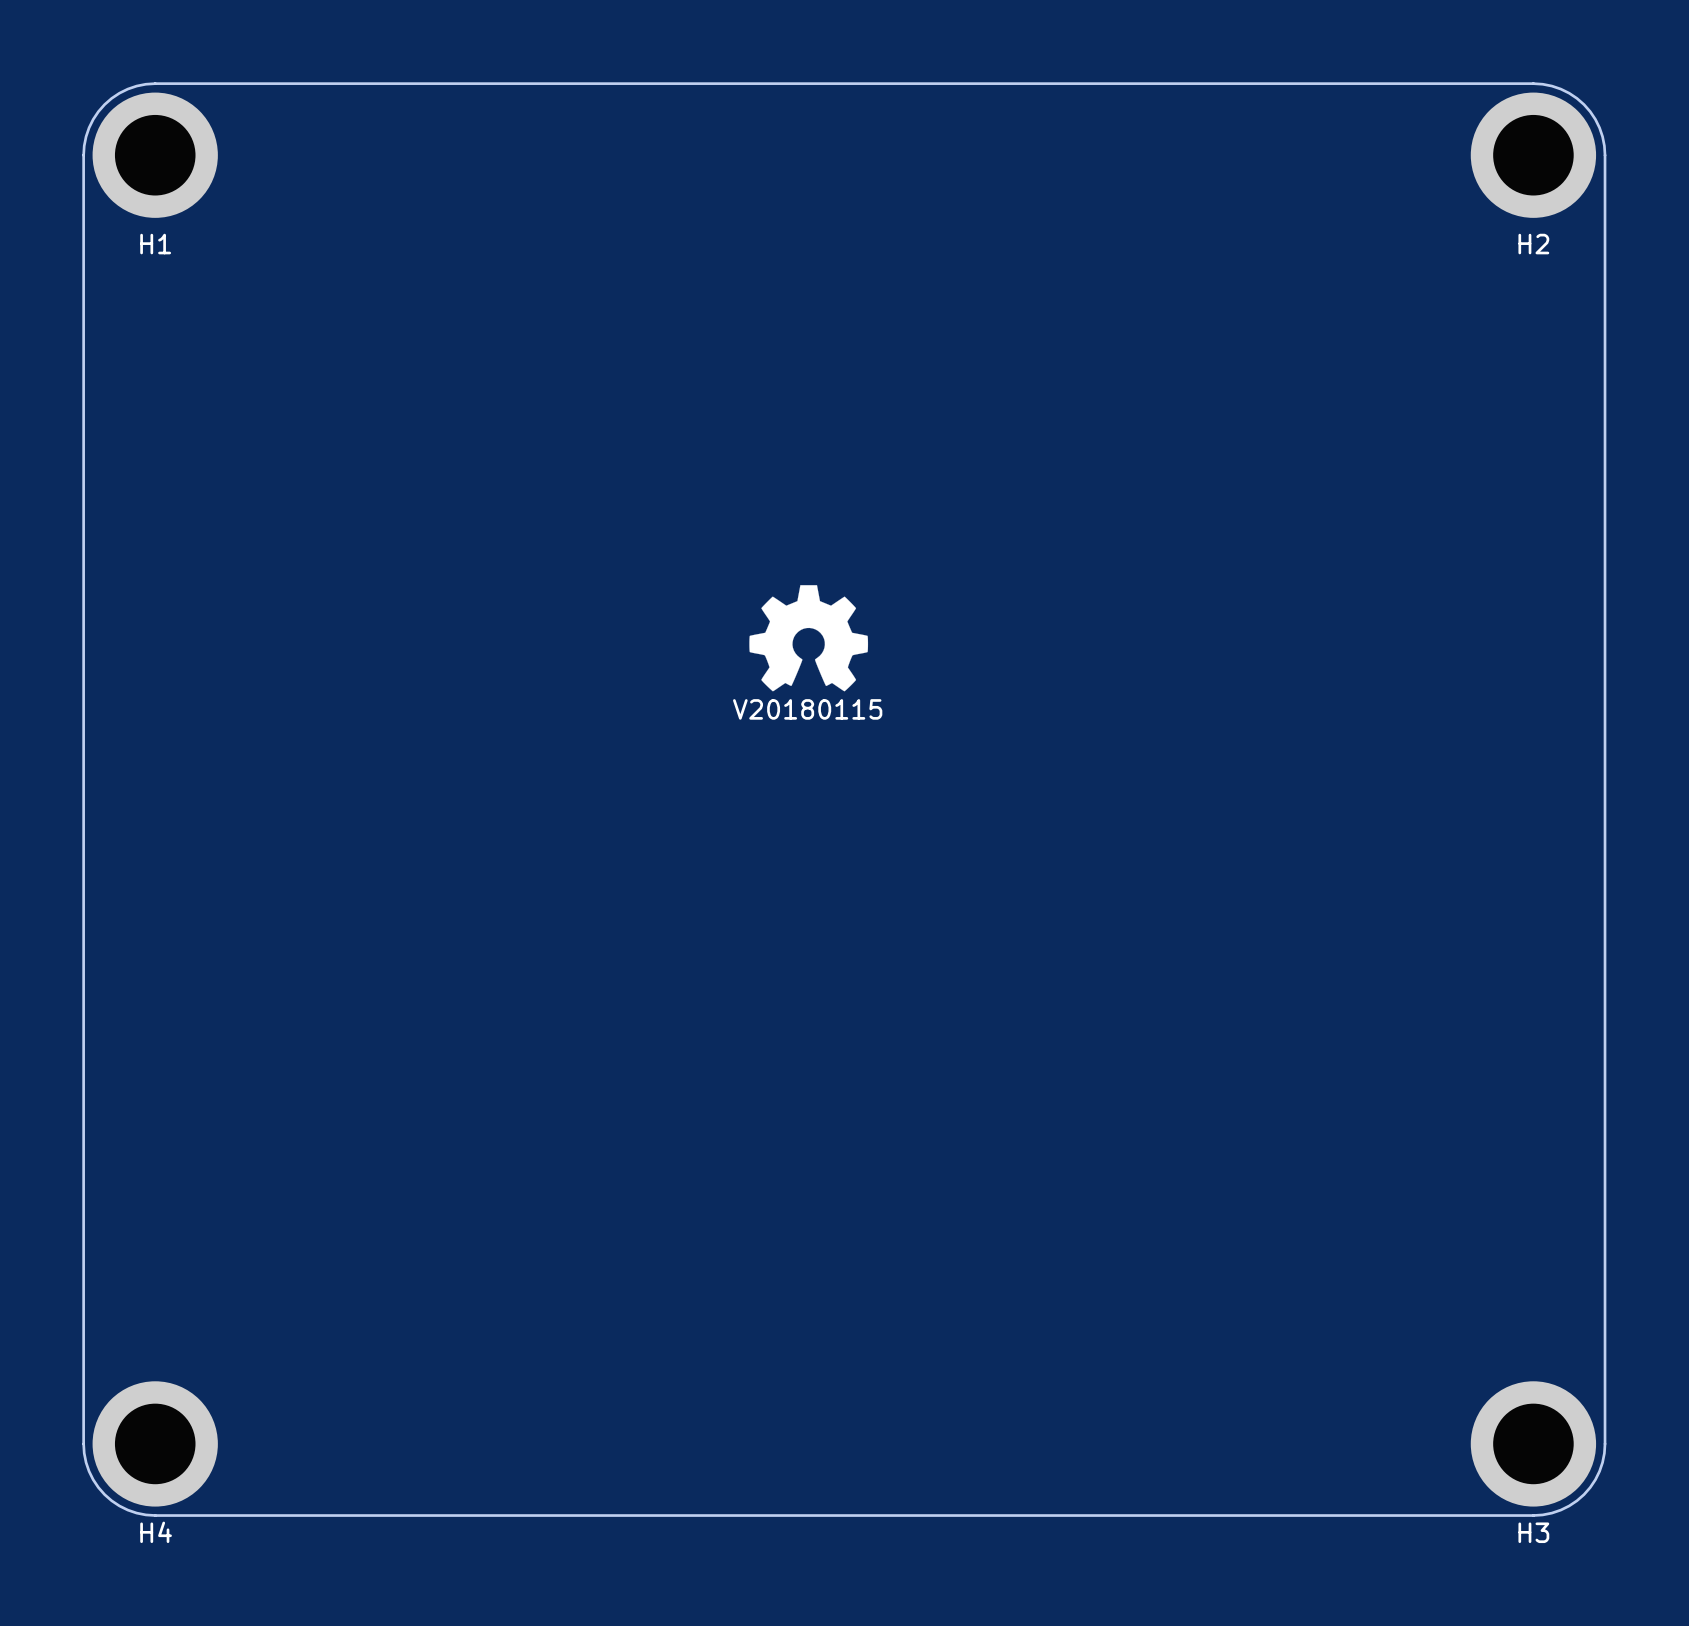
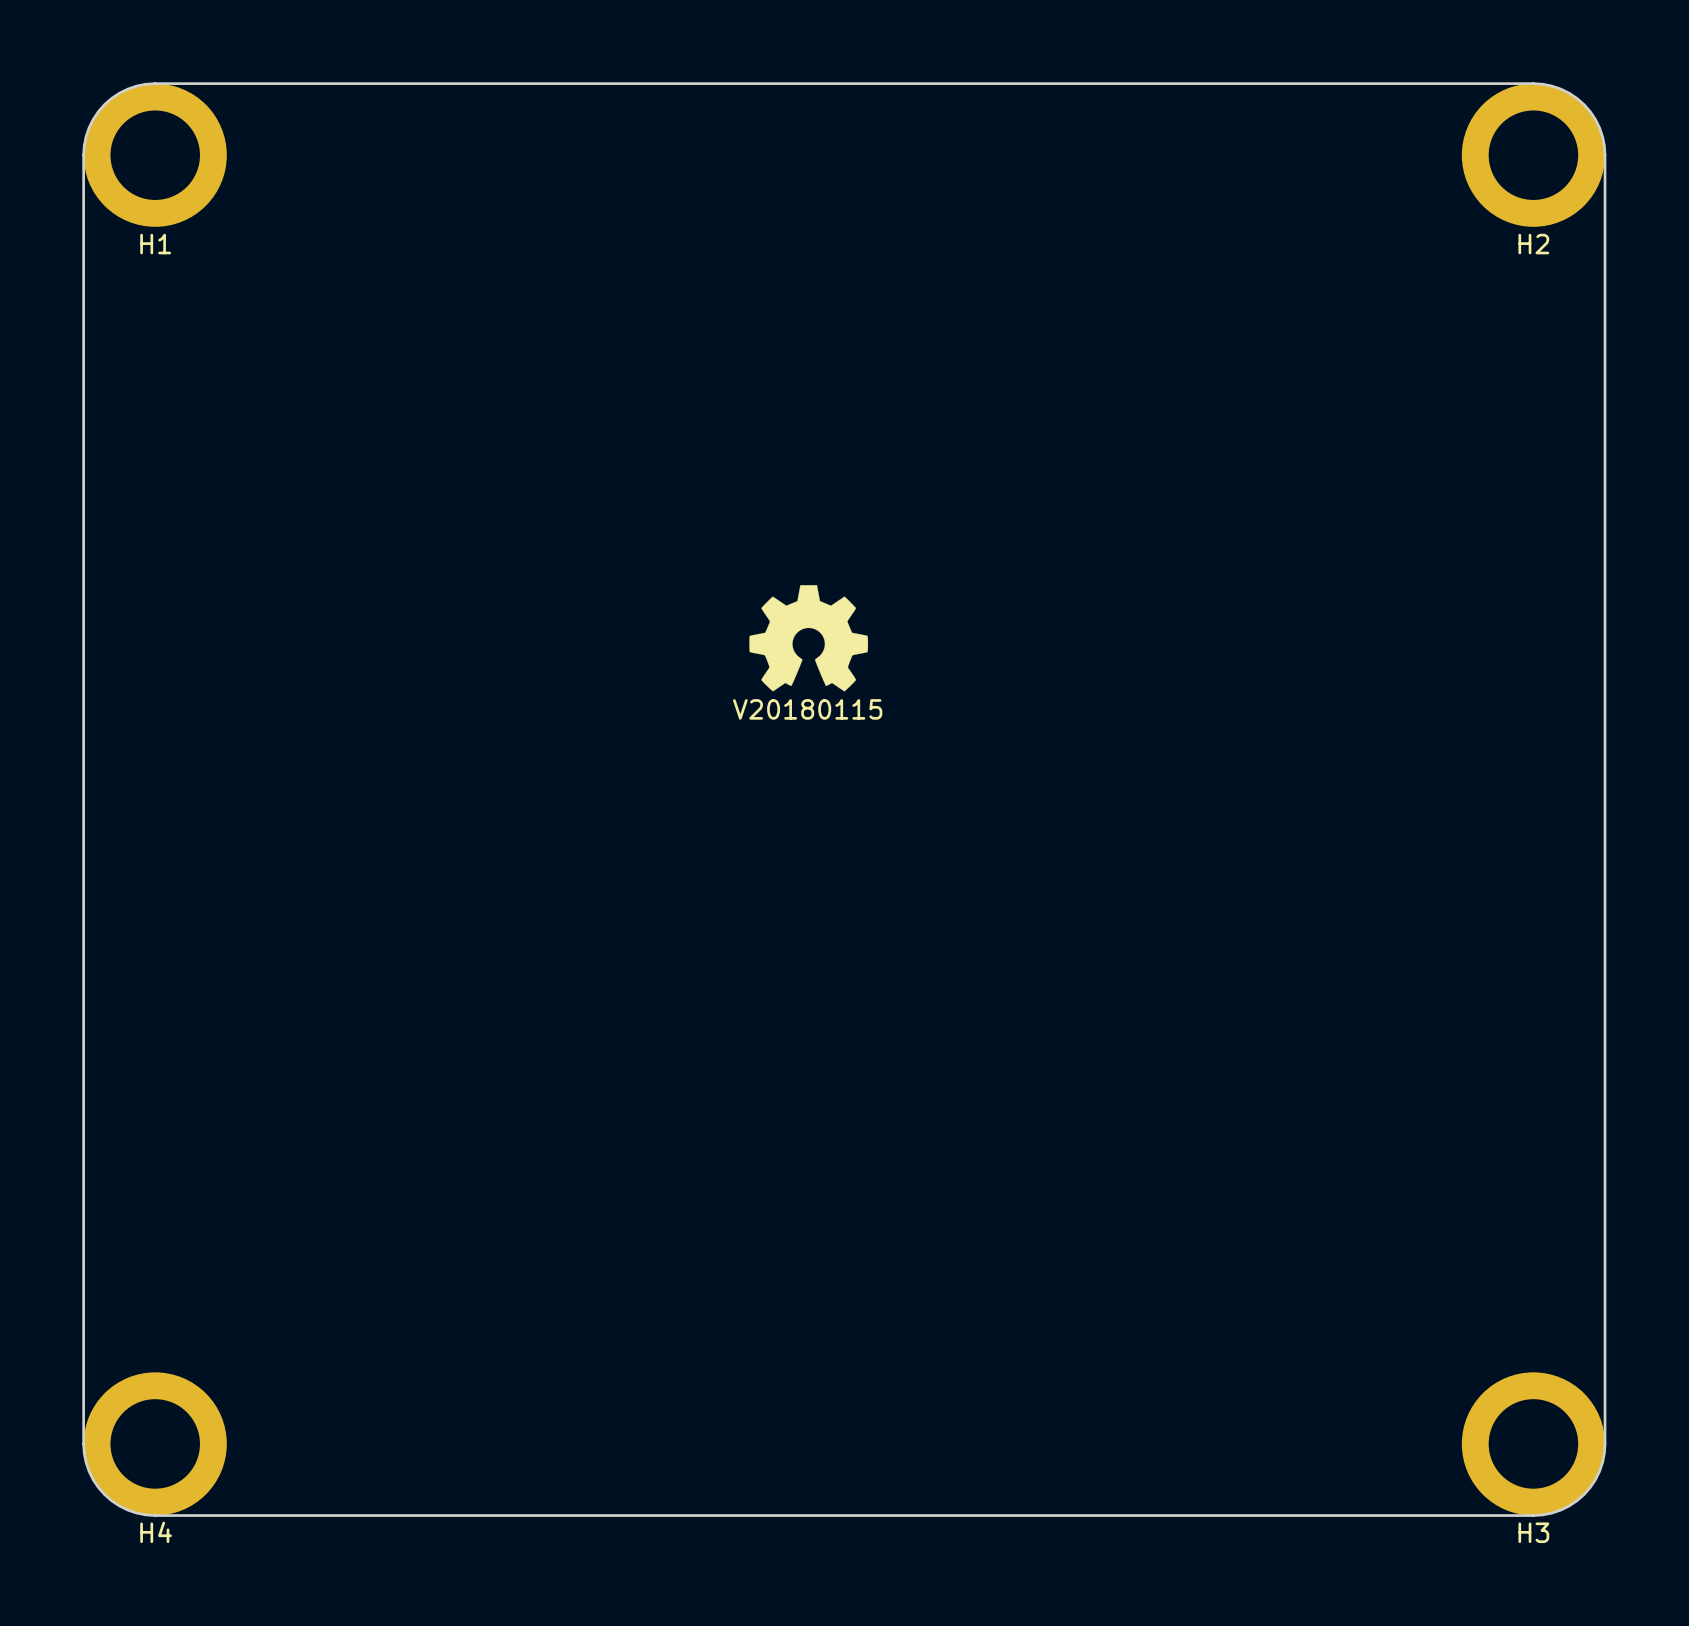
H1 footprint: [92, 92, 218, 218] -> [83, 83, 227, 227]
H2 footprint: [1470, 92, 1597, 218] -> [1461, 83, 1606, 227]
H4 footprint: [92, 1381, 218, 1507] -> [83, 1372, 227, 1516]
H3 footprint: [1470, 1381, 1597, 1507] -> [1461, 1372, 1606, 1516]

